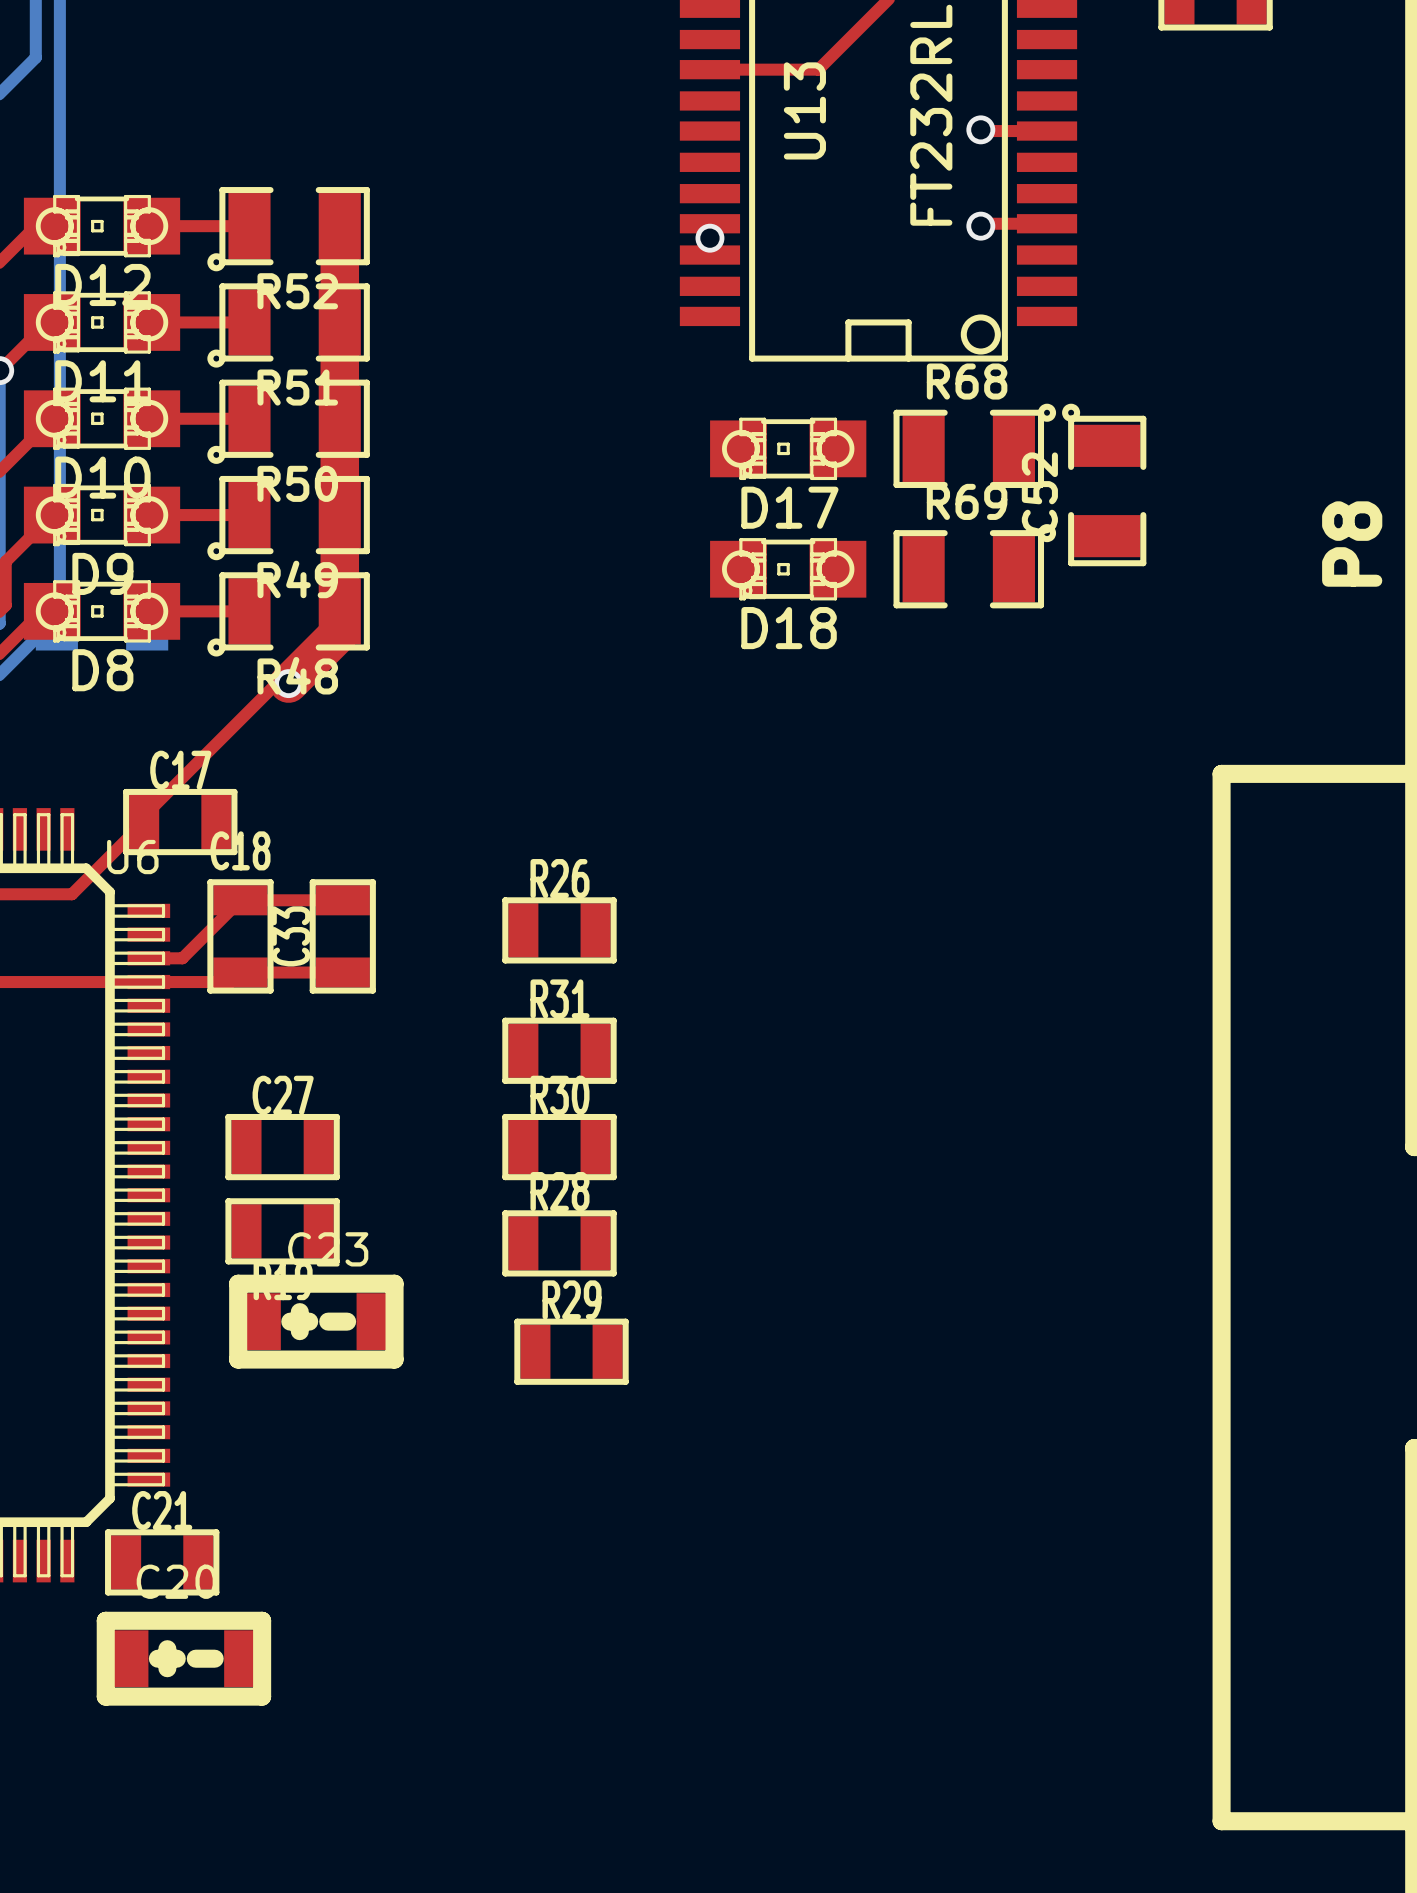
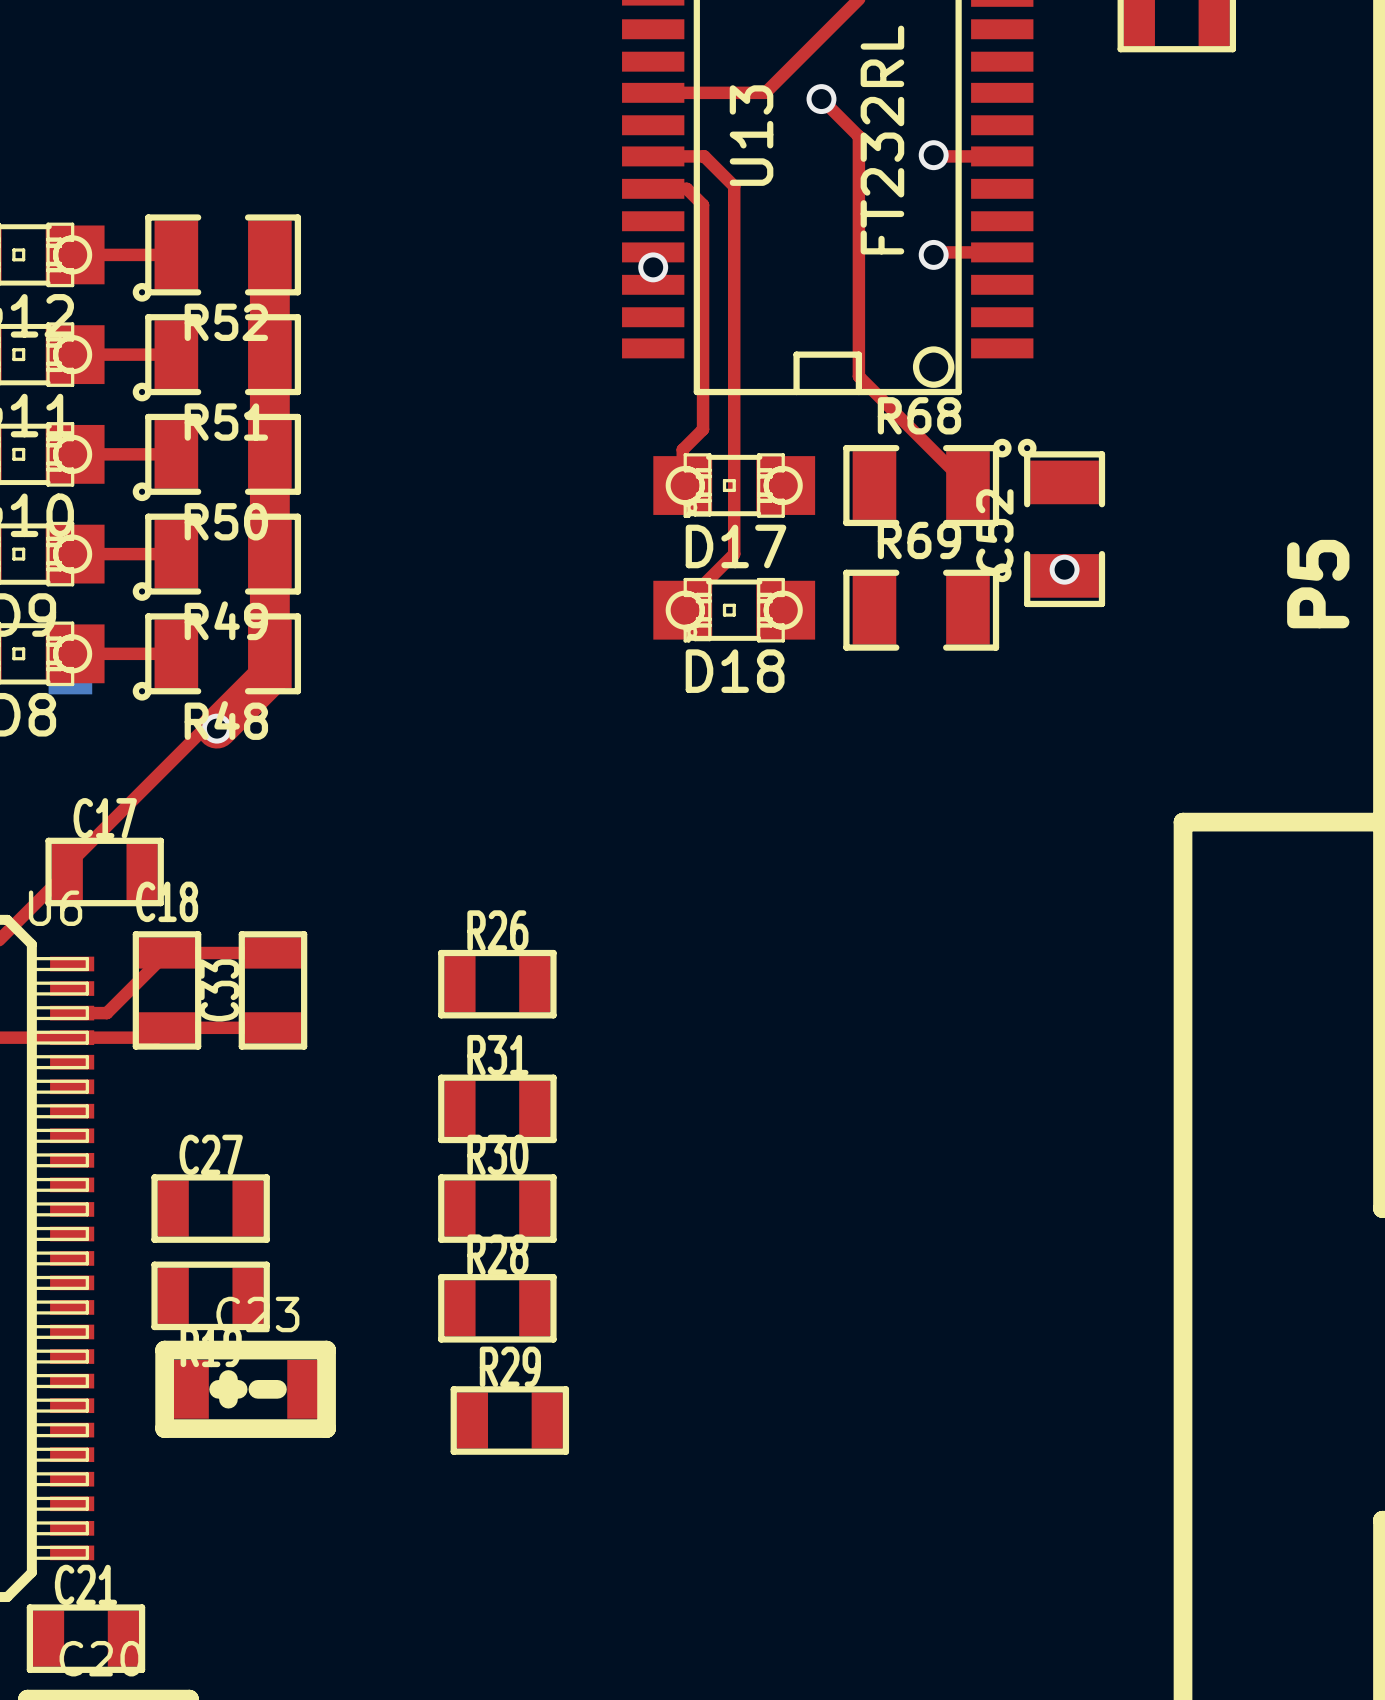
top track: none -> (821, 99) (858, 136) (858, 376) (967, 485)
via: none -> (821, 99)
top track: none -> (653, 156) (704, 156) (734, 186) (734, 554) (682, 605) (682, 610)
top track: none -> (653, 188) (686, 188) (703, 205) (703, 429) (682, 449) (682, 485)
via: none -> (1064, 569)
P8 name: P8 (1352, 544) -> P5 (1318, 584)

